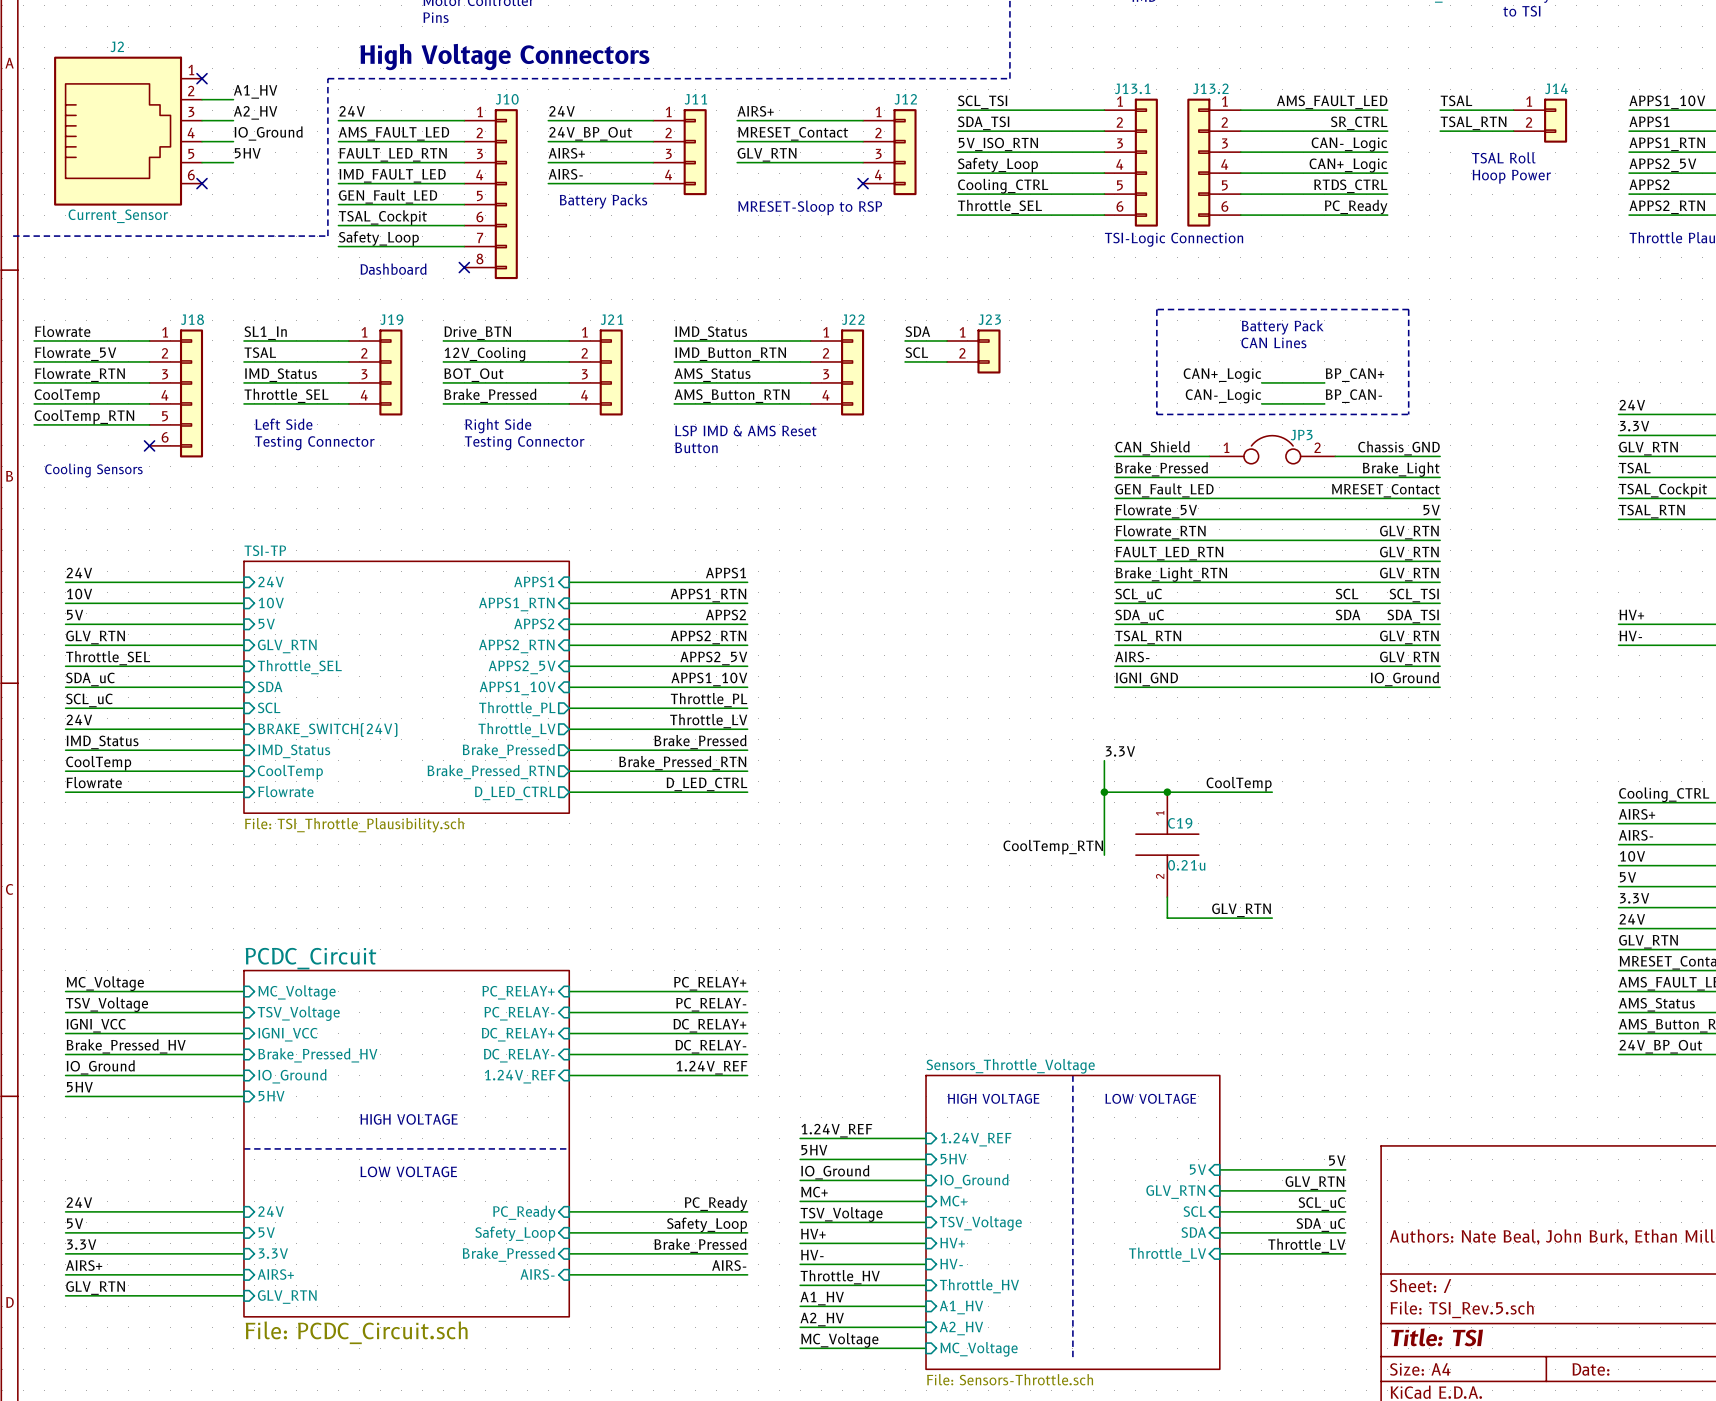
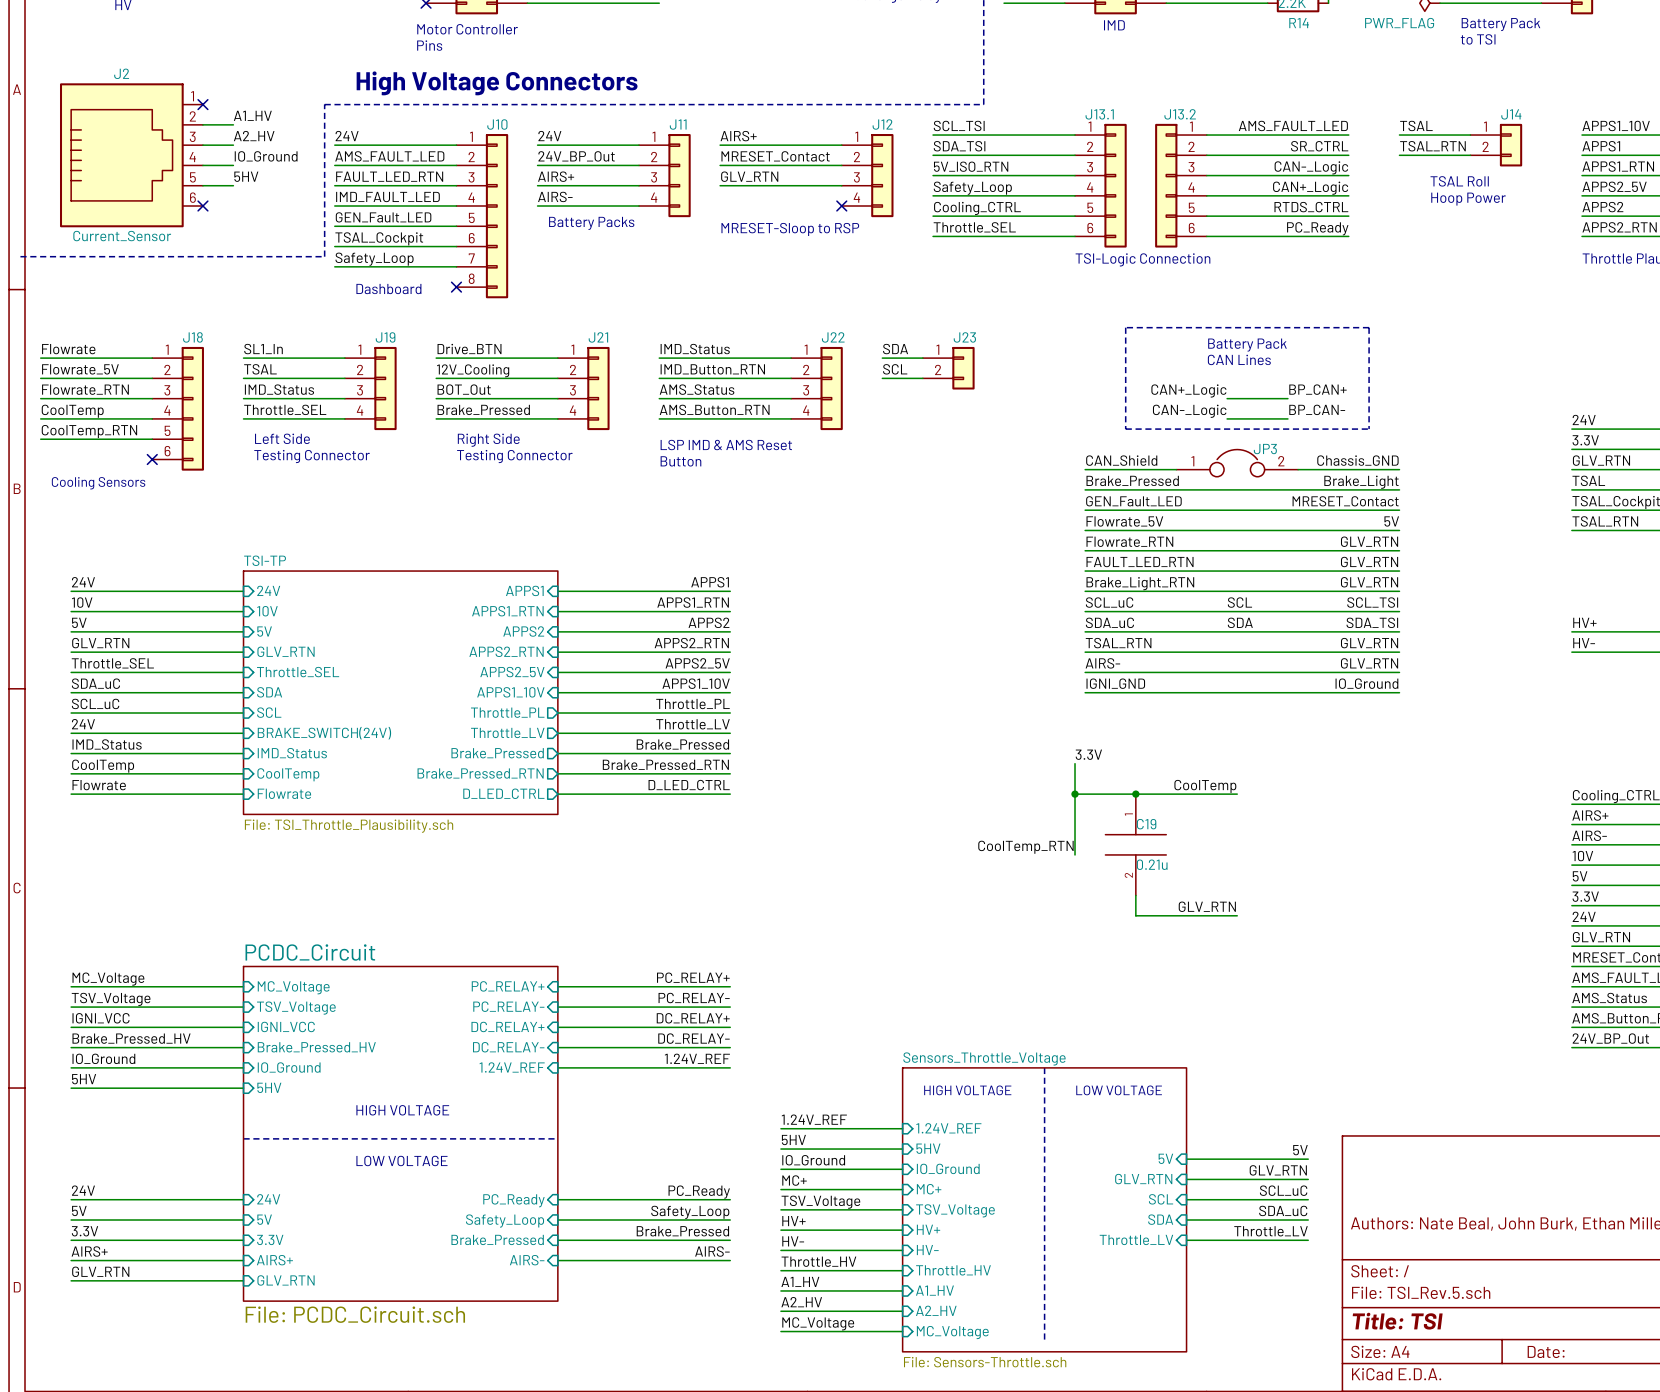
label position: SCL (1347, 594) -> SCL (1239, 602)
label position: SDA (1348, 615) -> SDA (1240, 622)

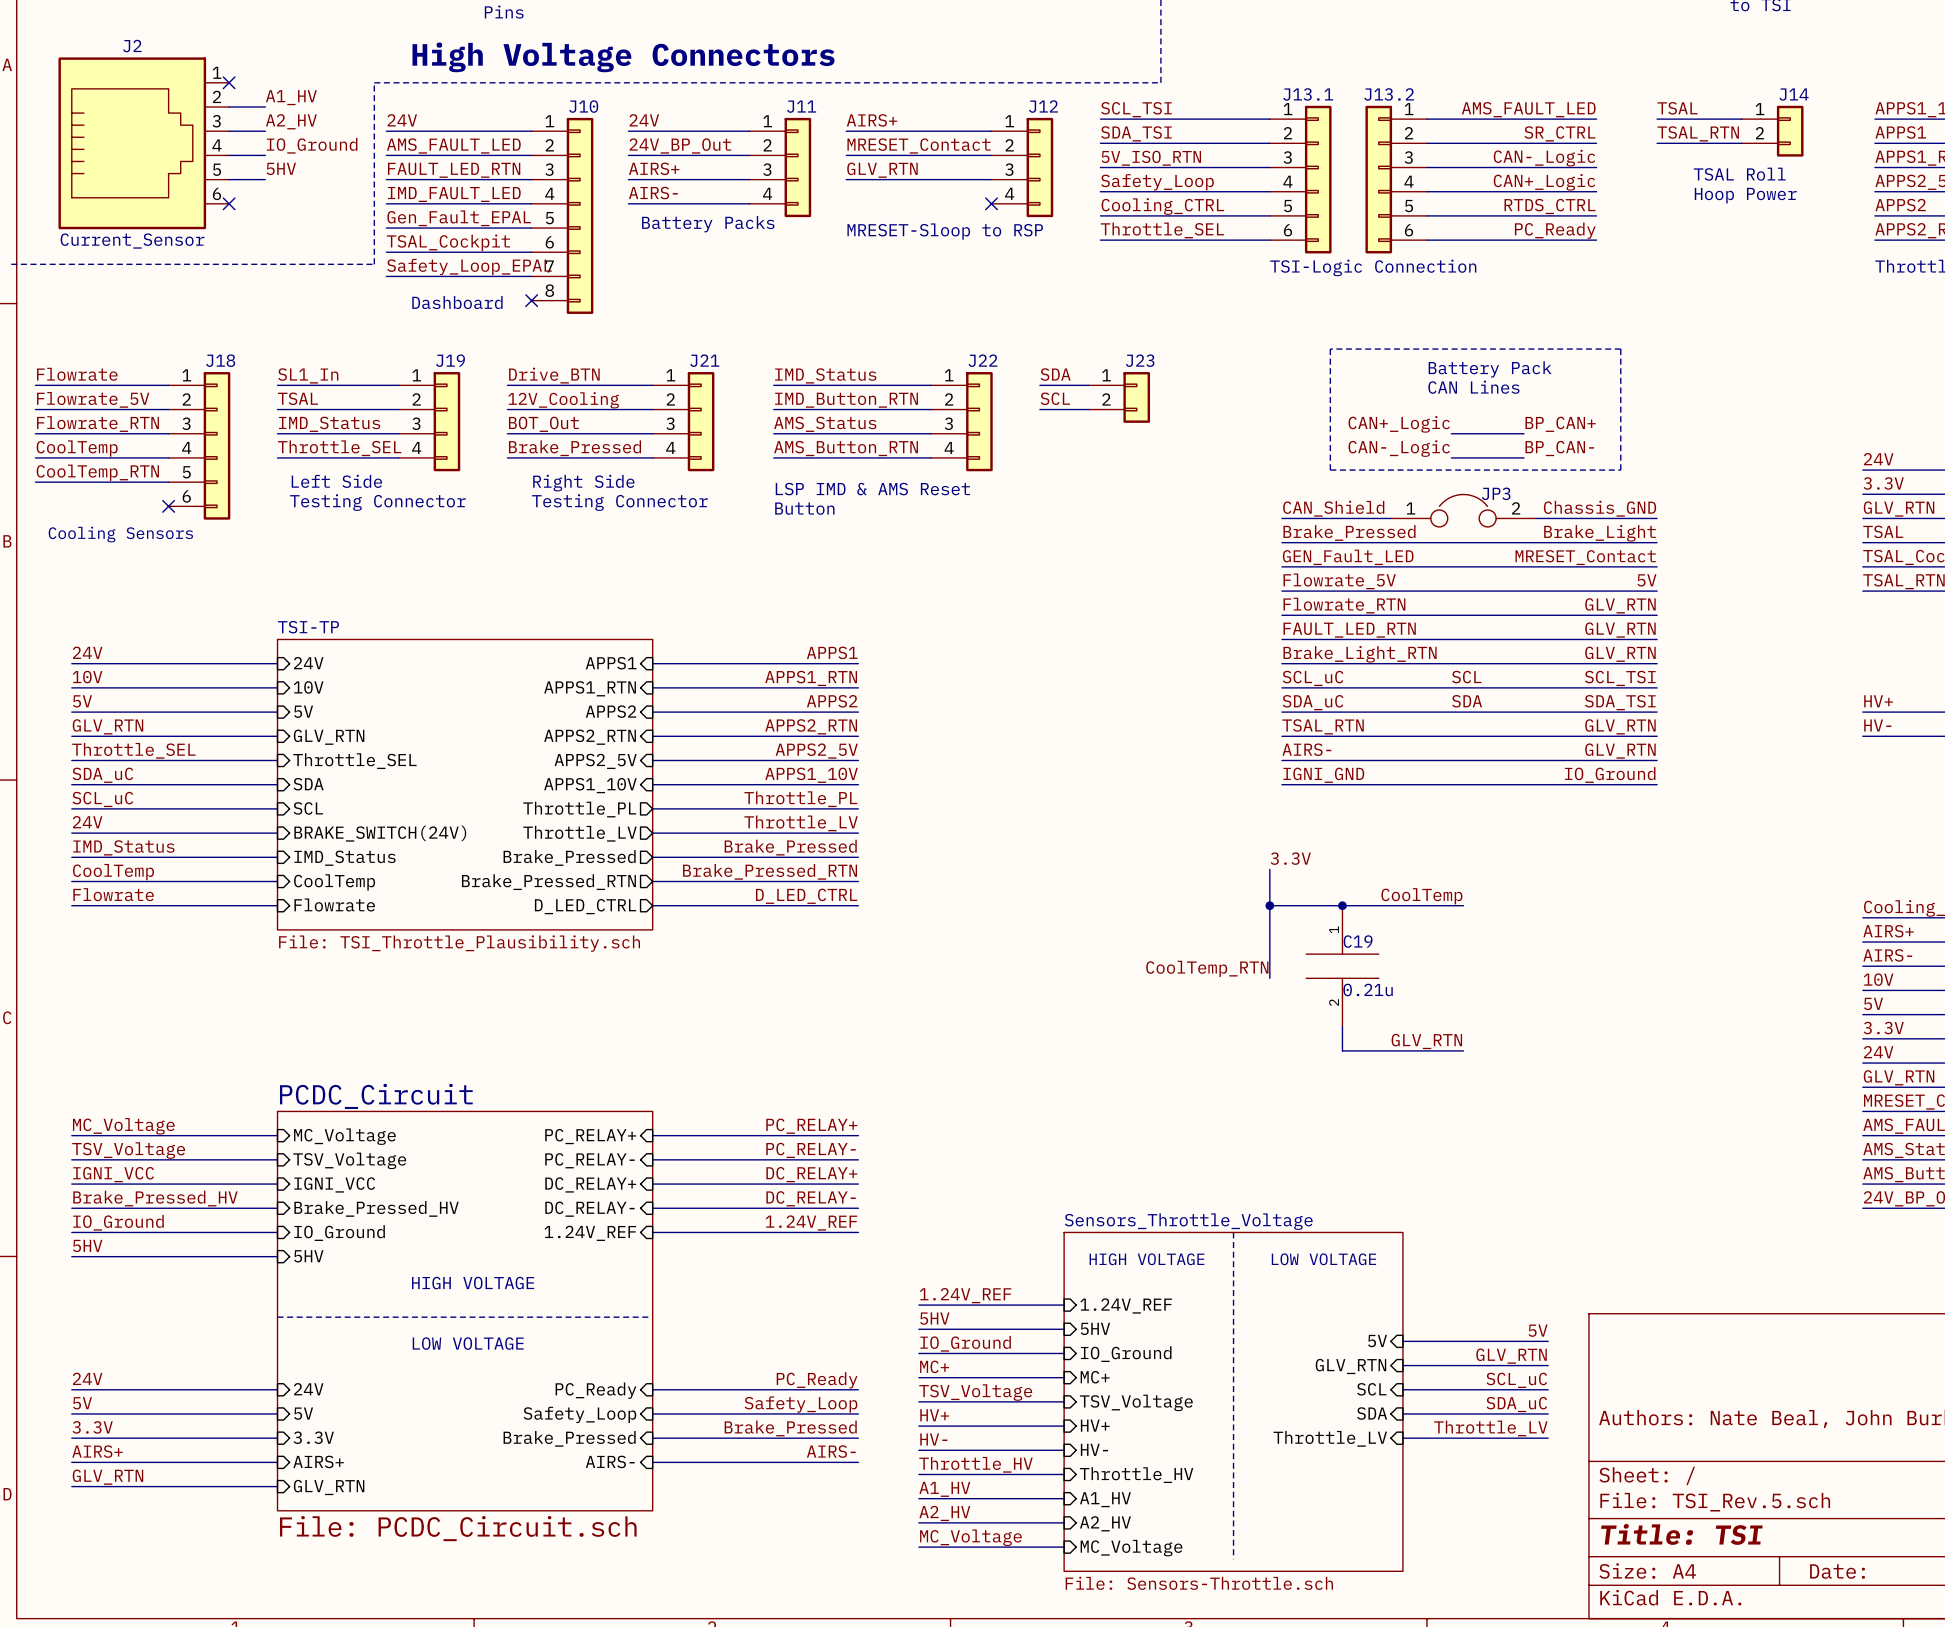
label: GEN_Fault_LED (383, 217) -> Gen_Fault_EPAL (459, 218)
label: Safety_Loop (374, 259) -> Safety_Loop_EPAL (469, 267)

